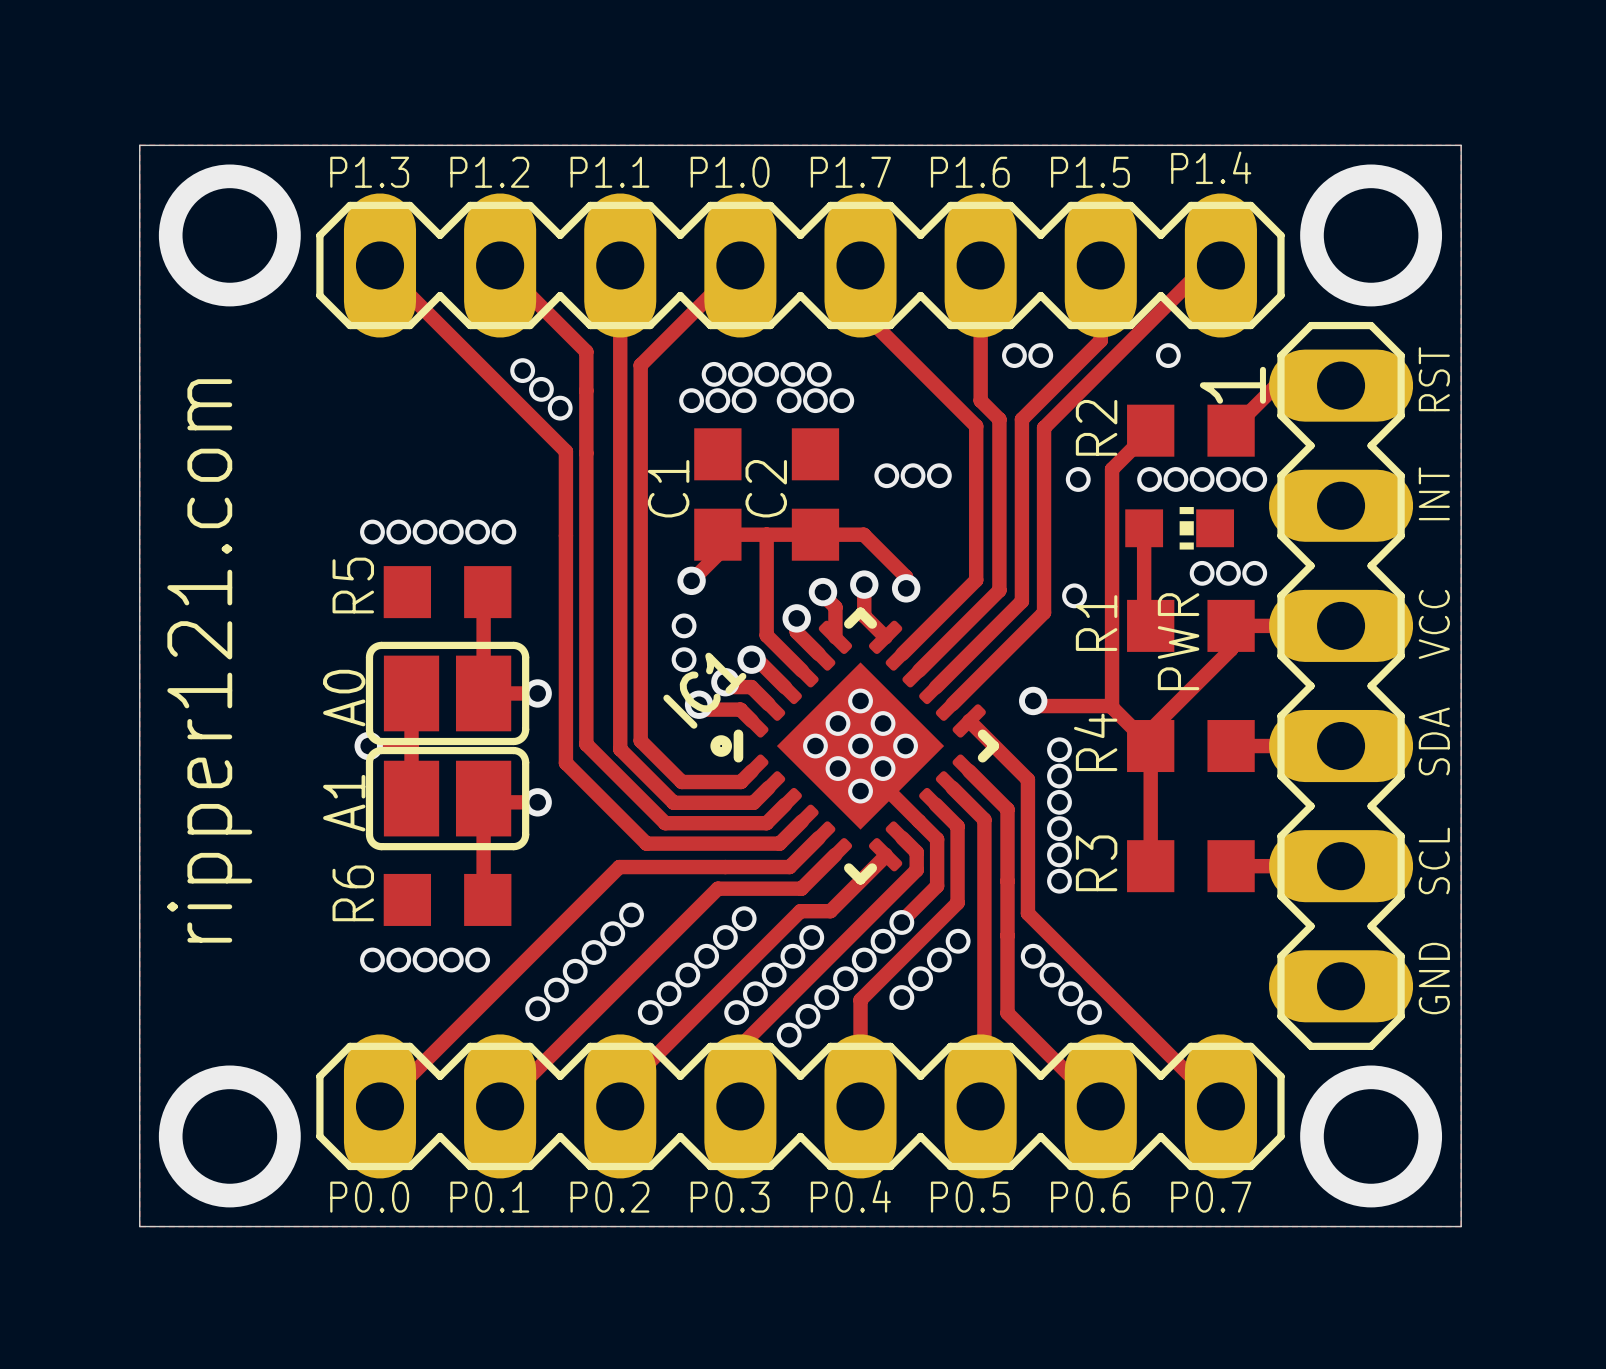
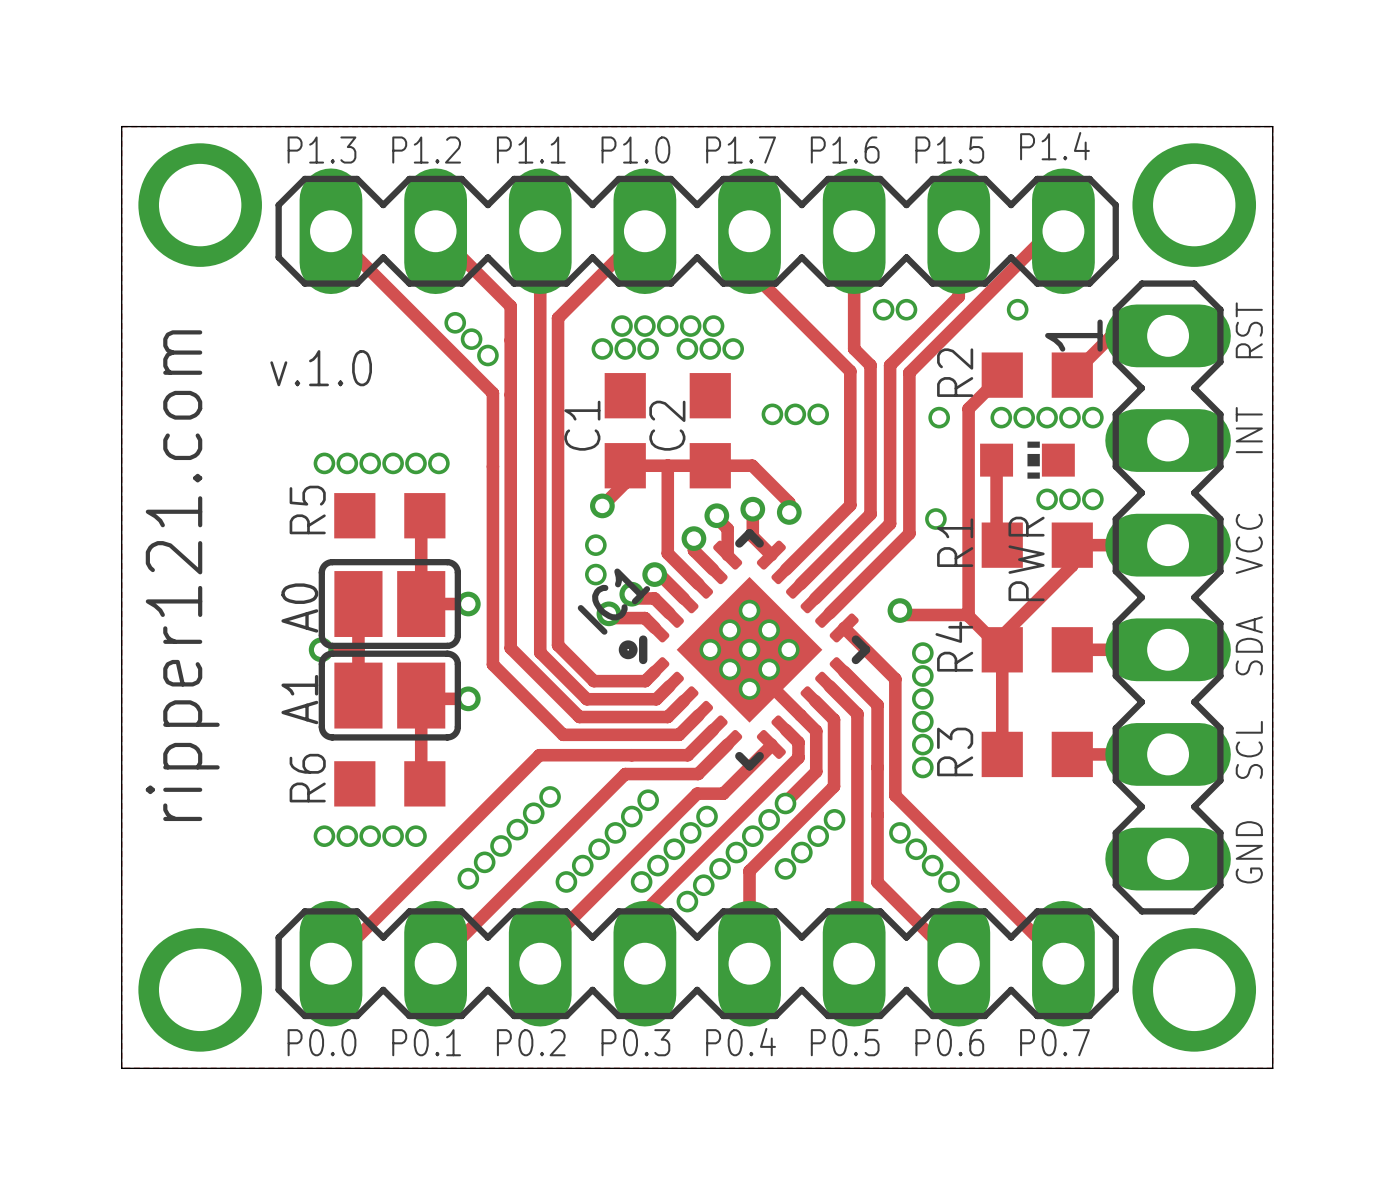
text: none -> v.1.0 (321, 368)

